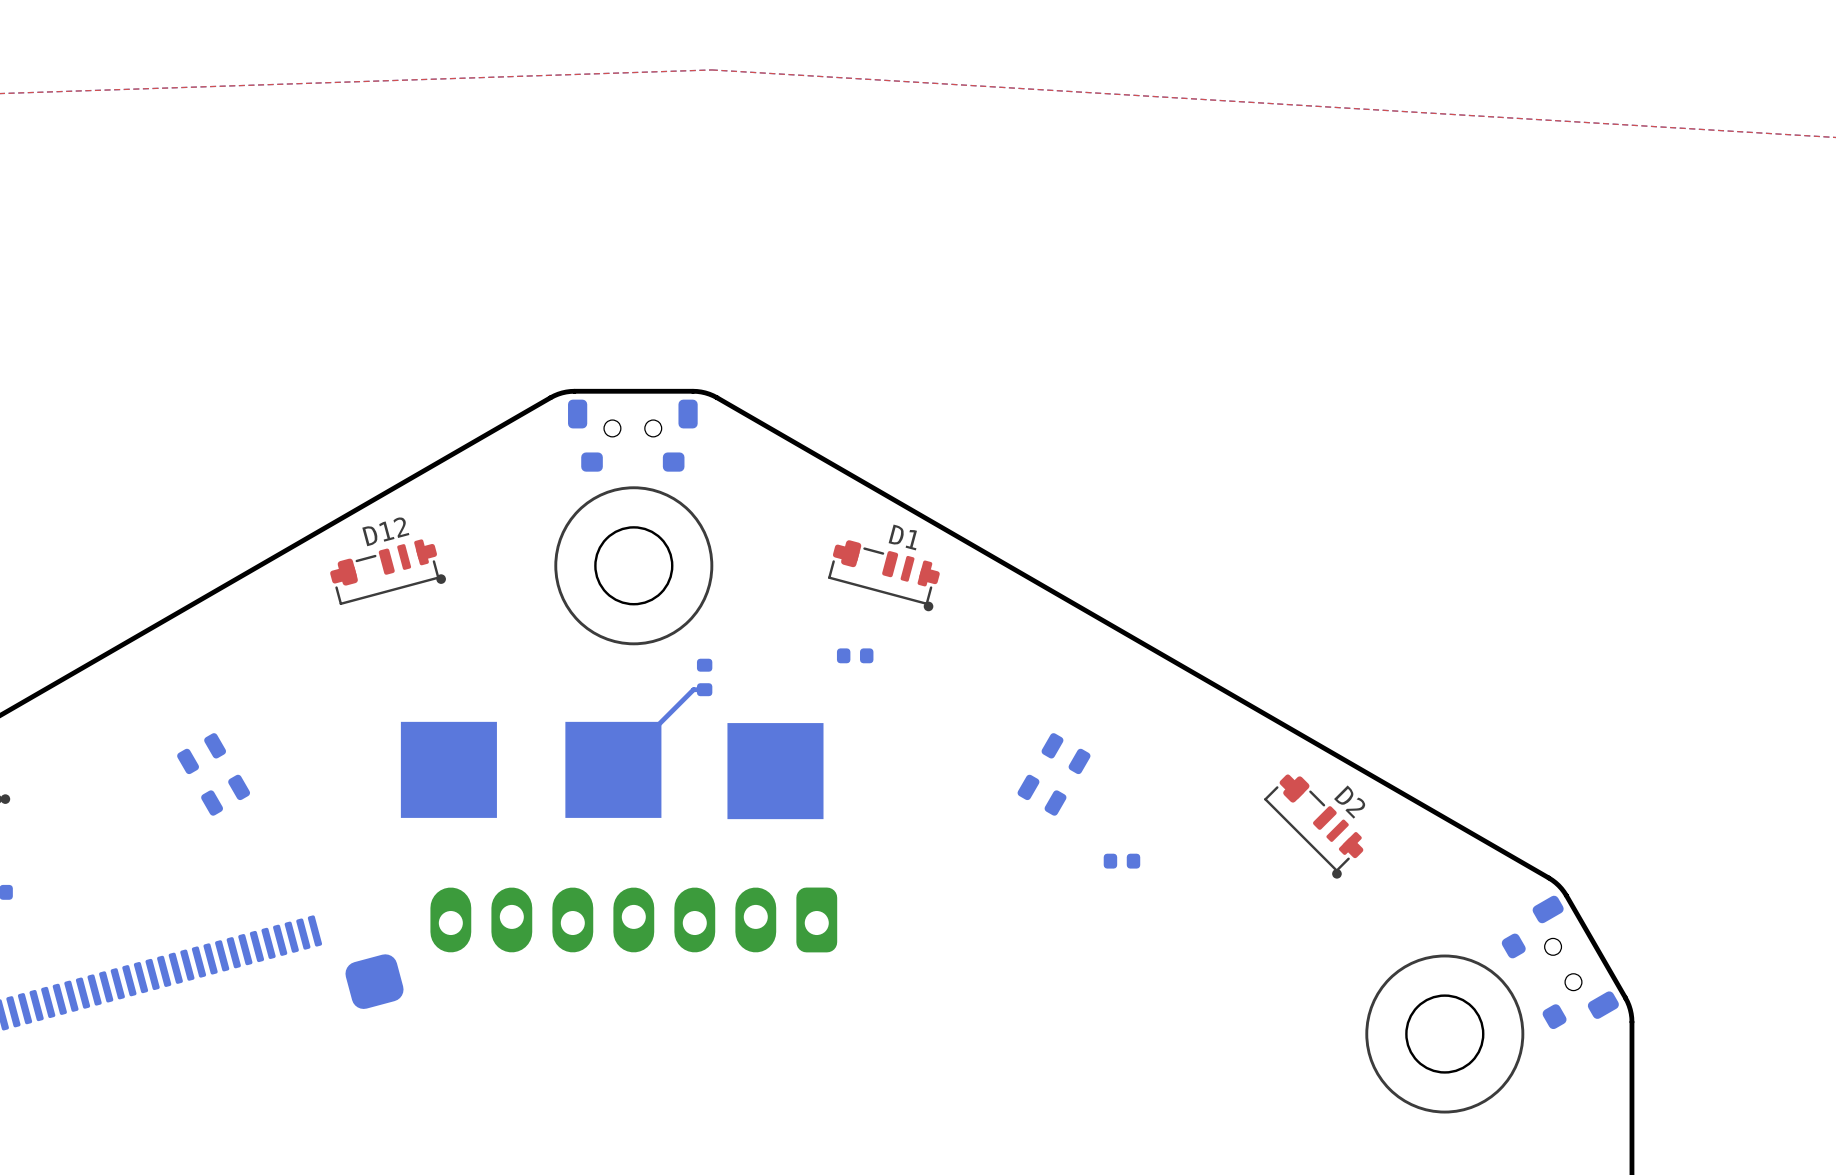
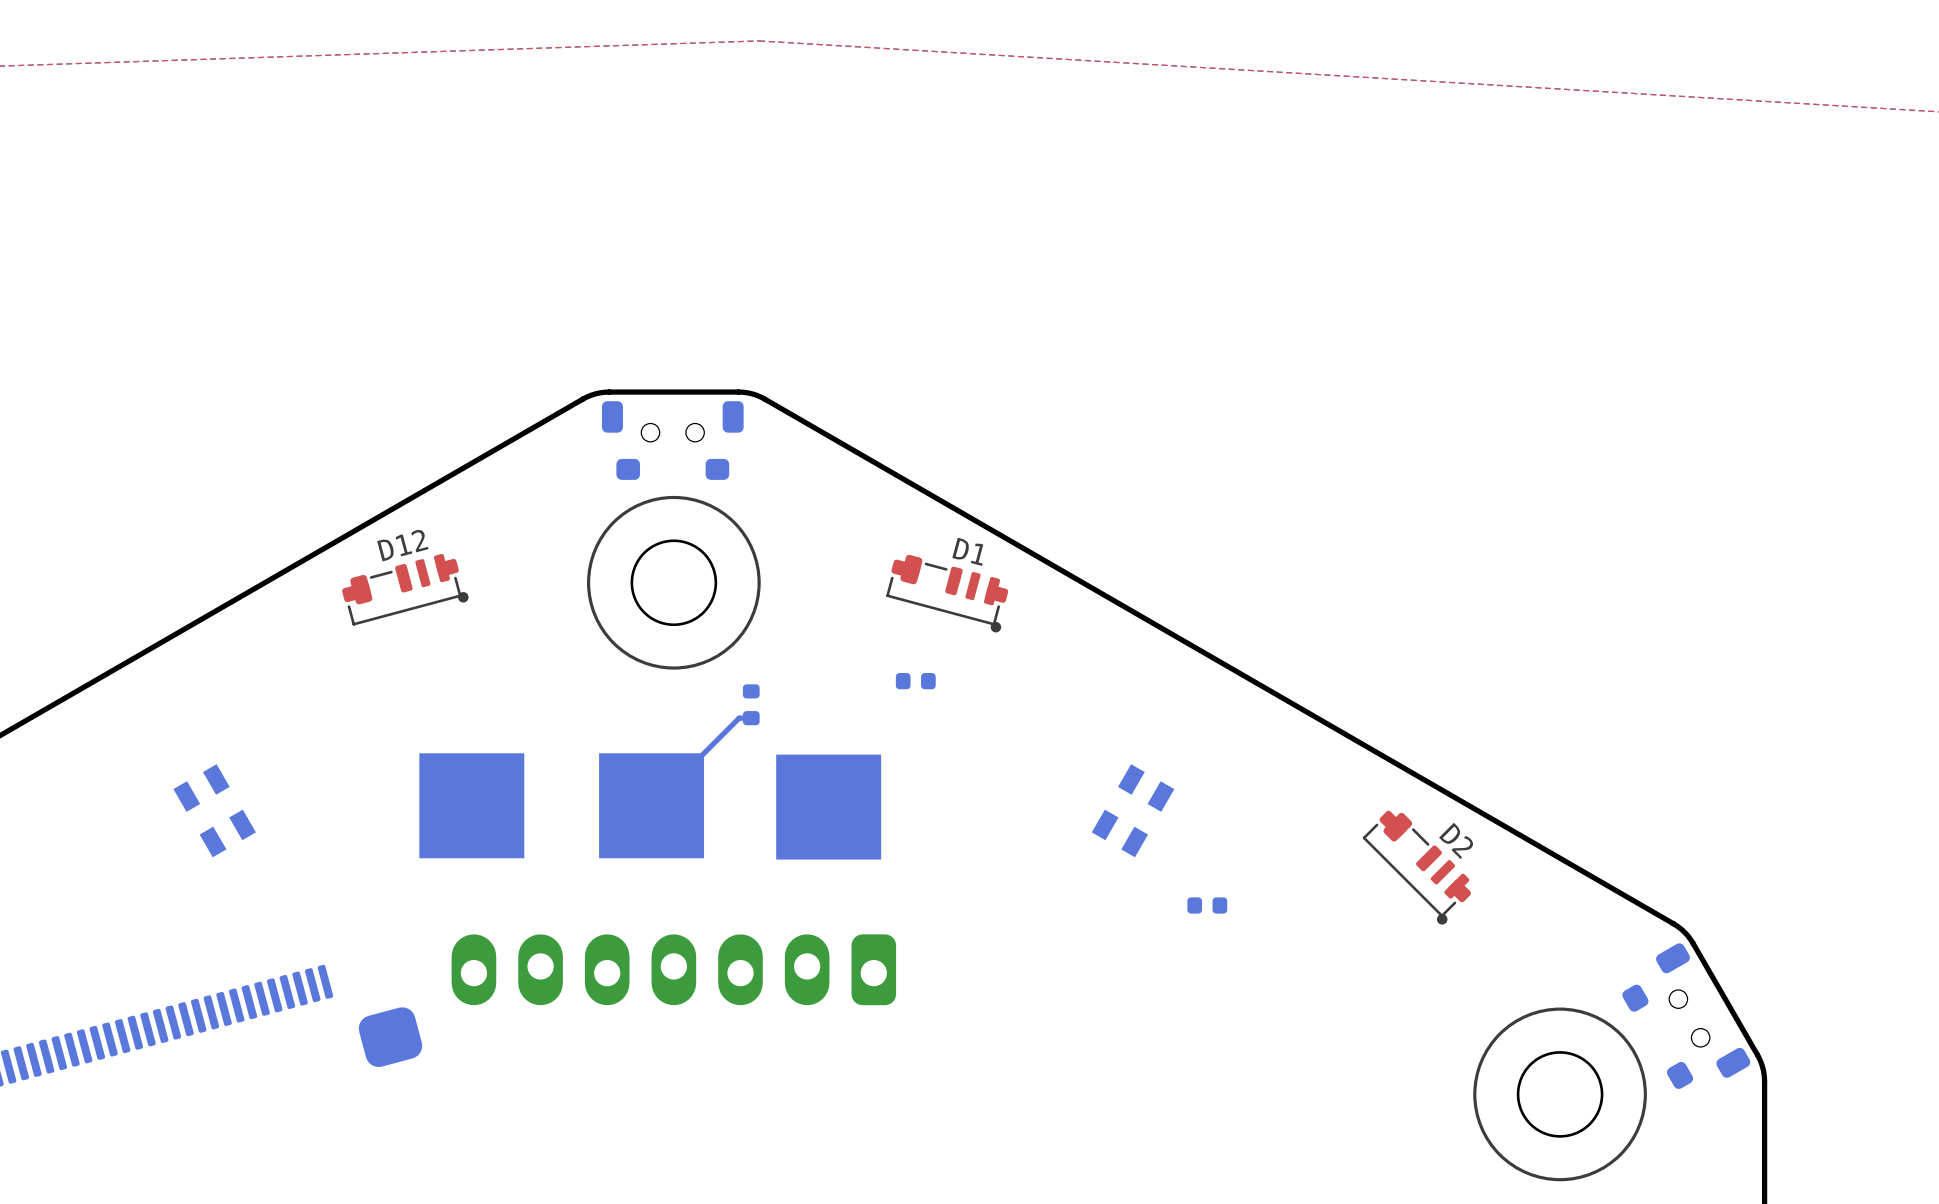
part footprint: [177, 733, 251, 816] -> [173, 764, 256, 858]
part footprint: [1017, 733, 1091, 816] -> [1091, 764, 1175, 858]

